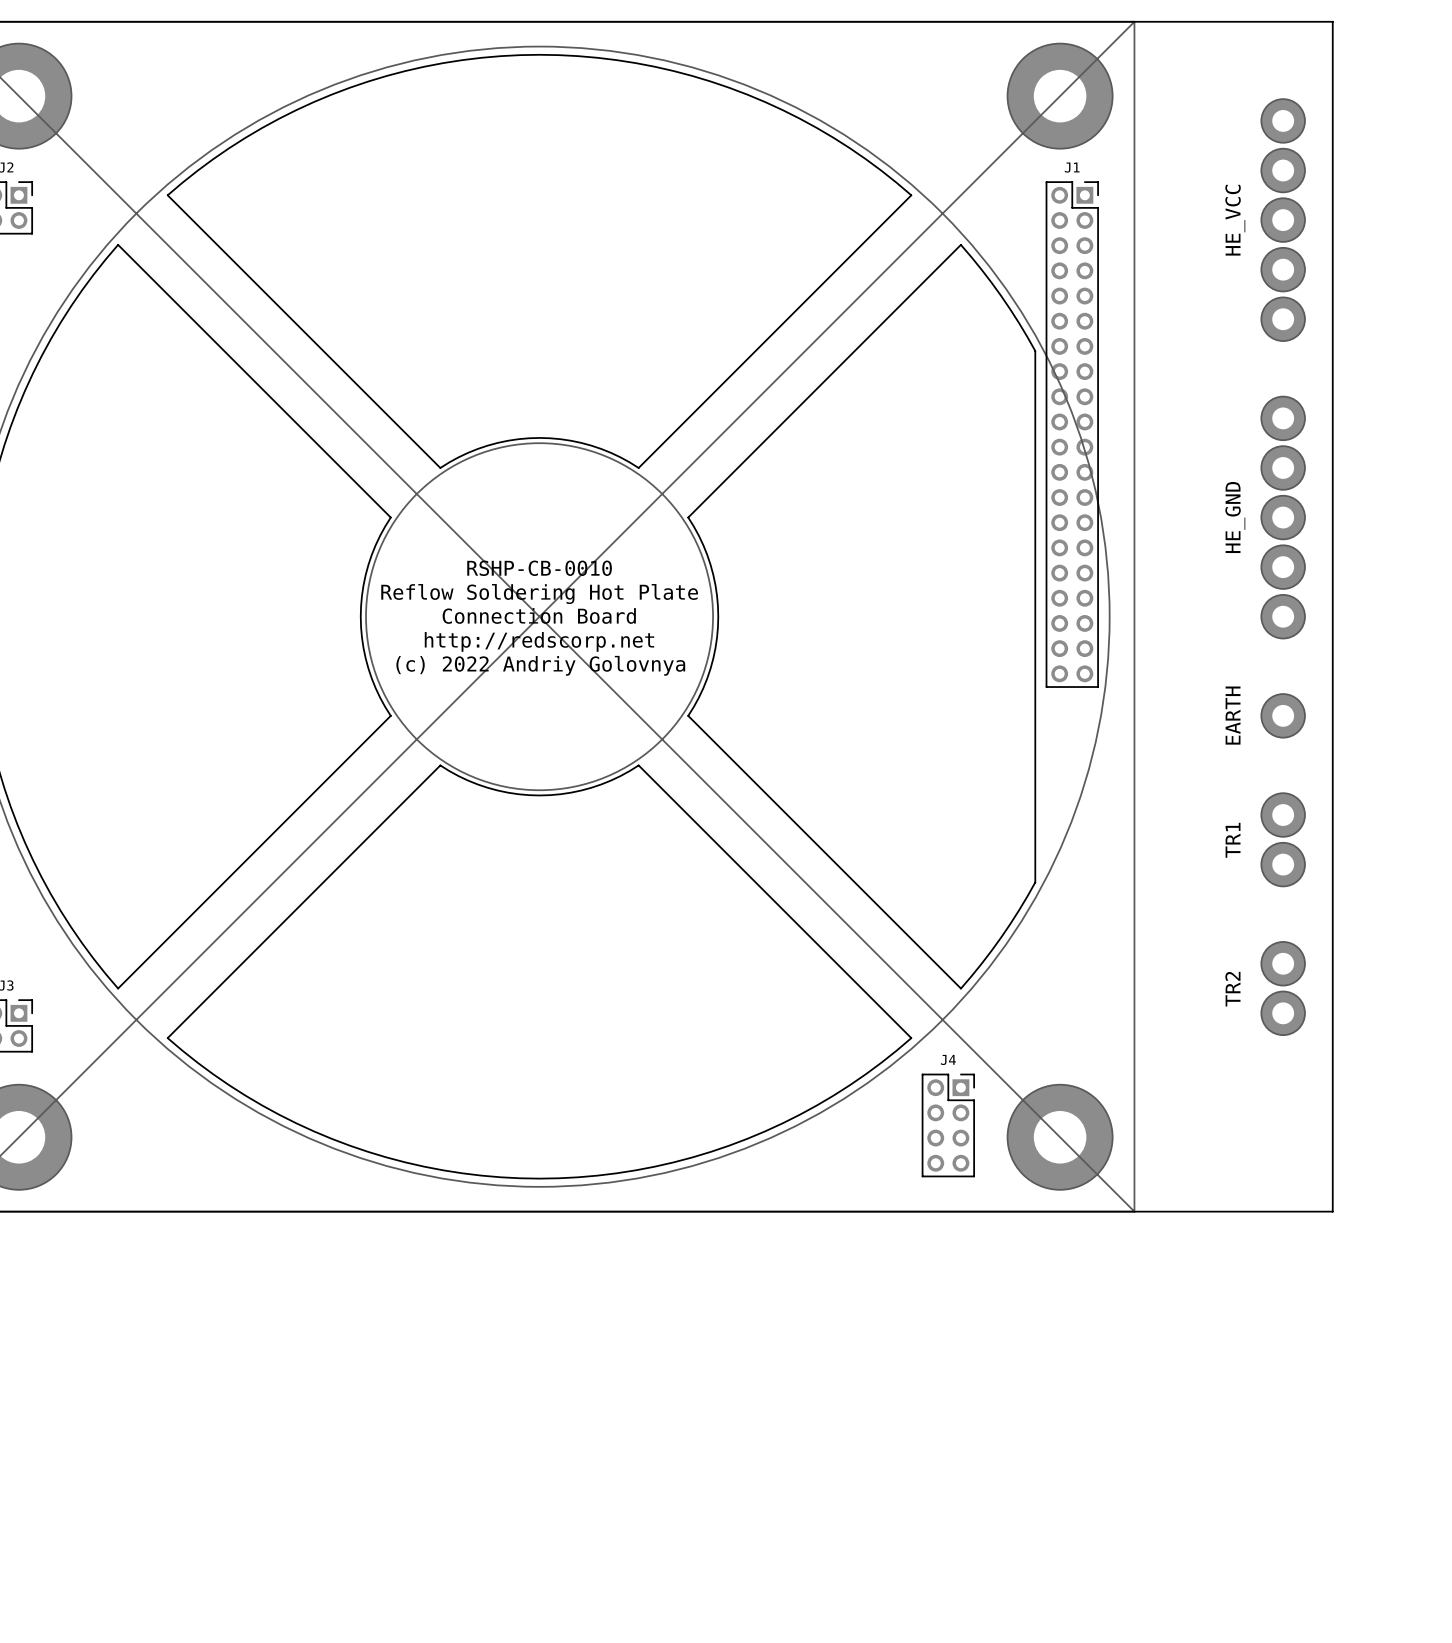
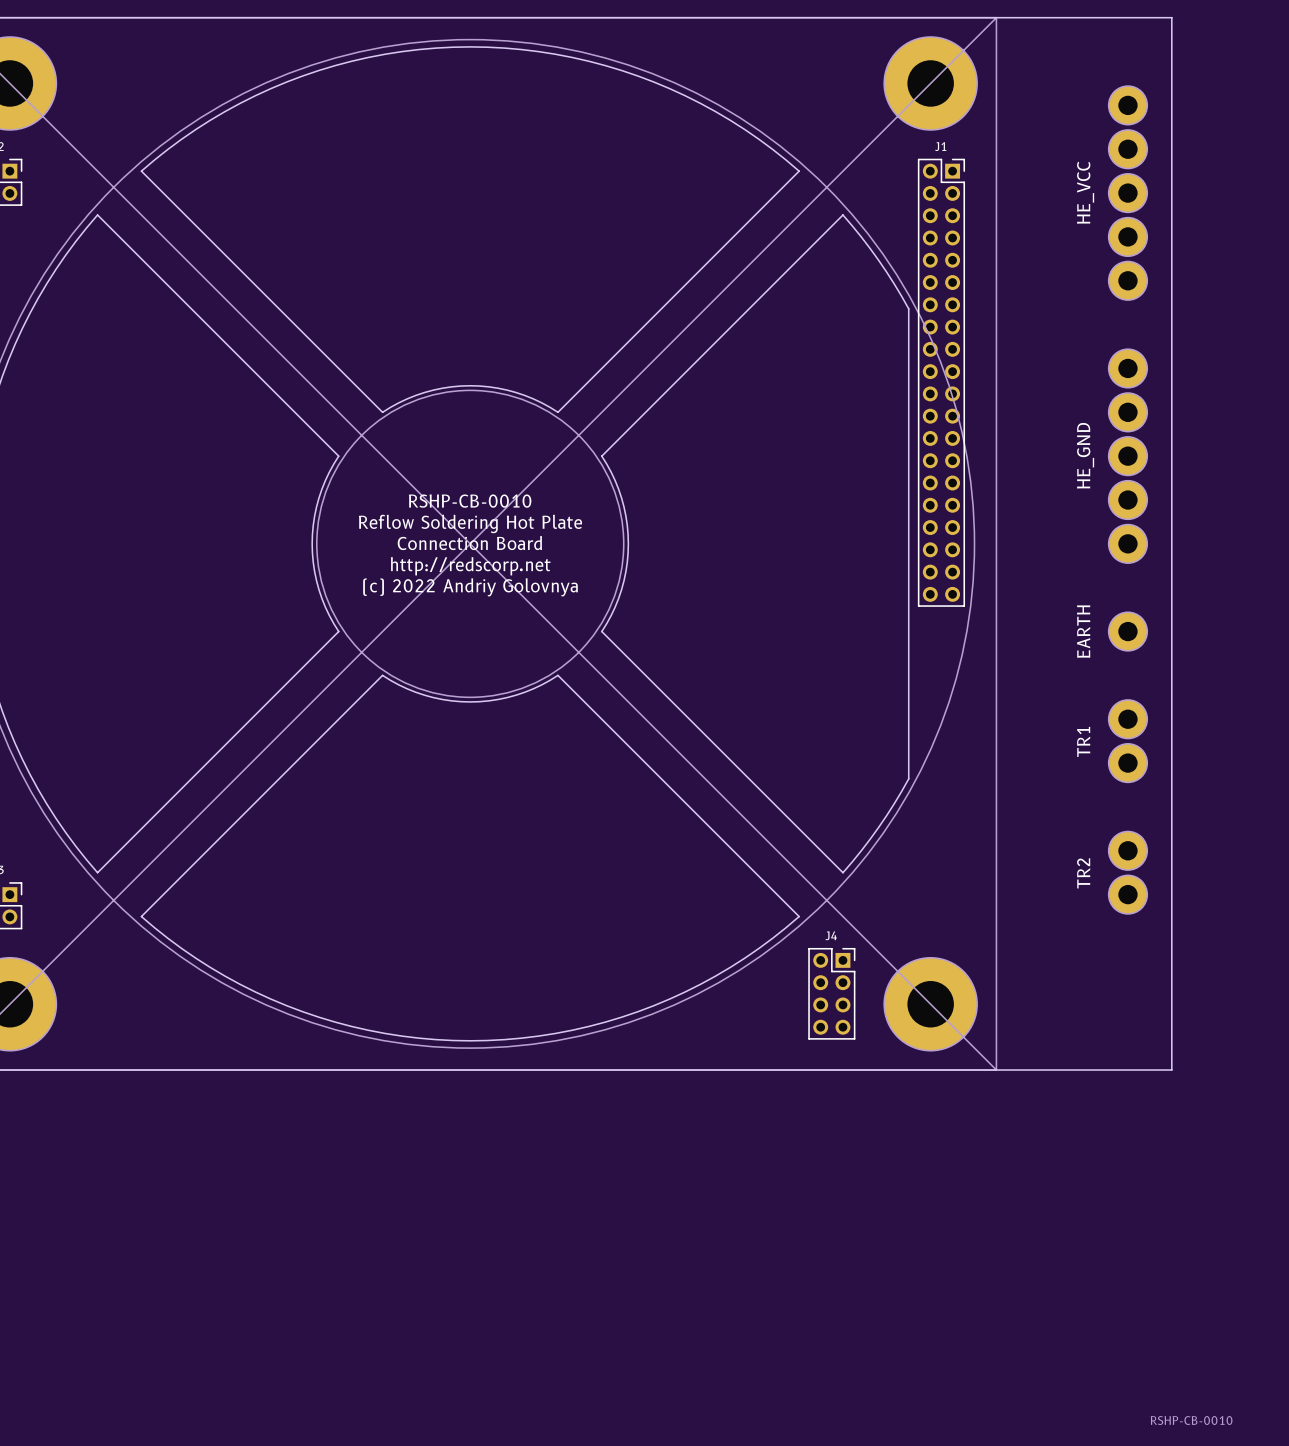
text: none -> RSHP-CB-0010 (1191, 1420)

